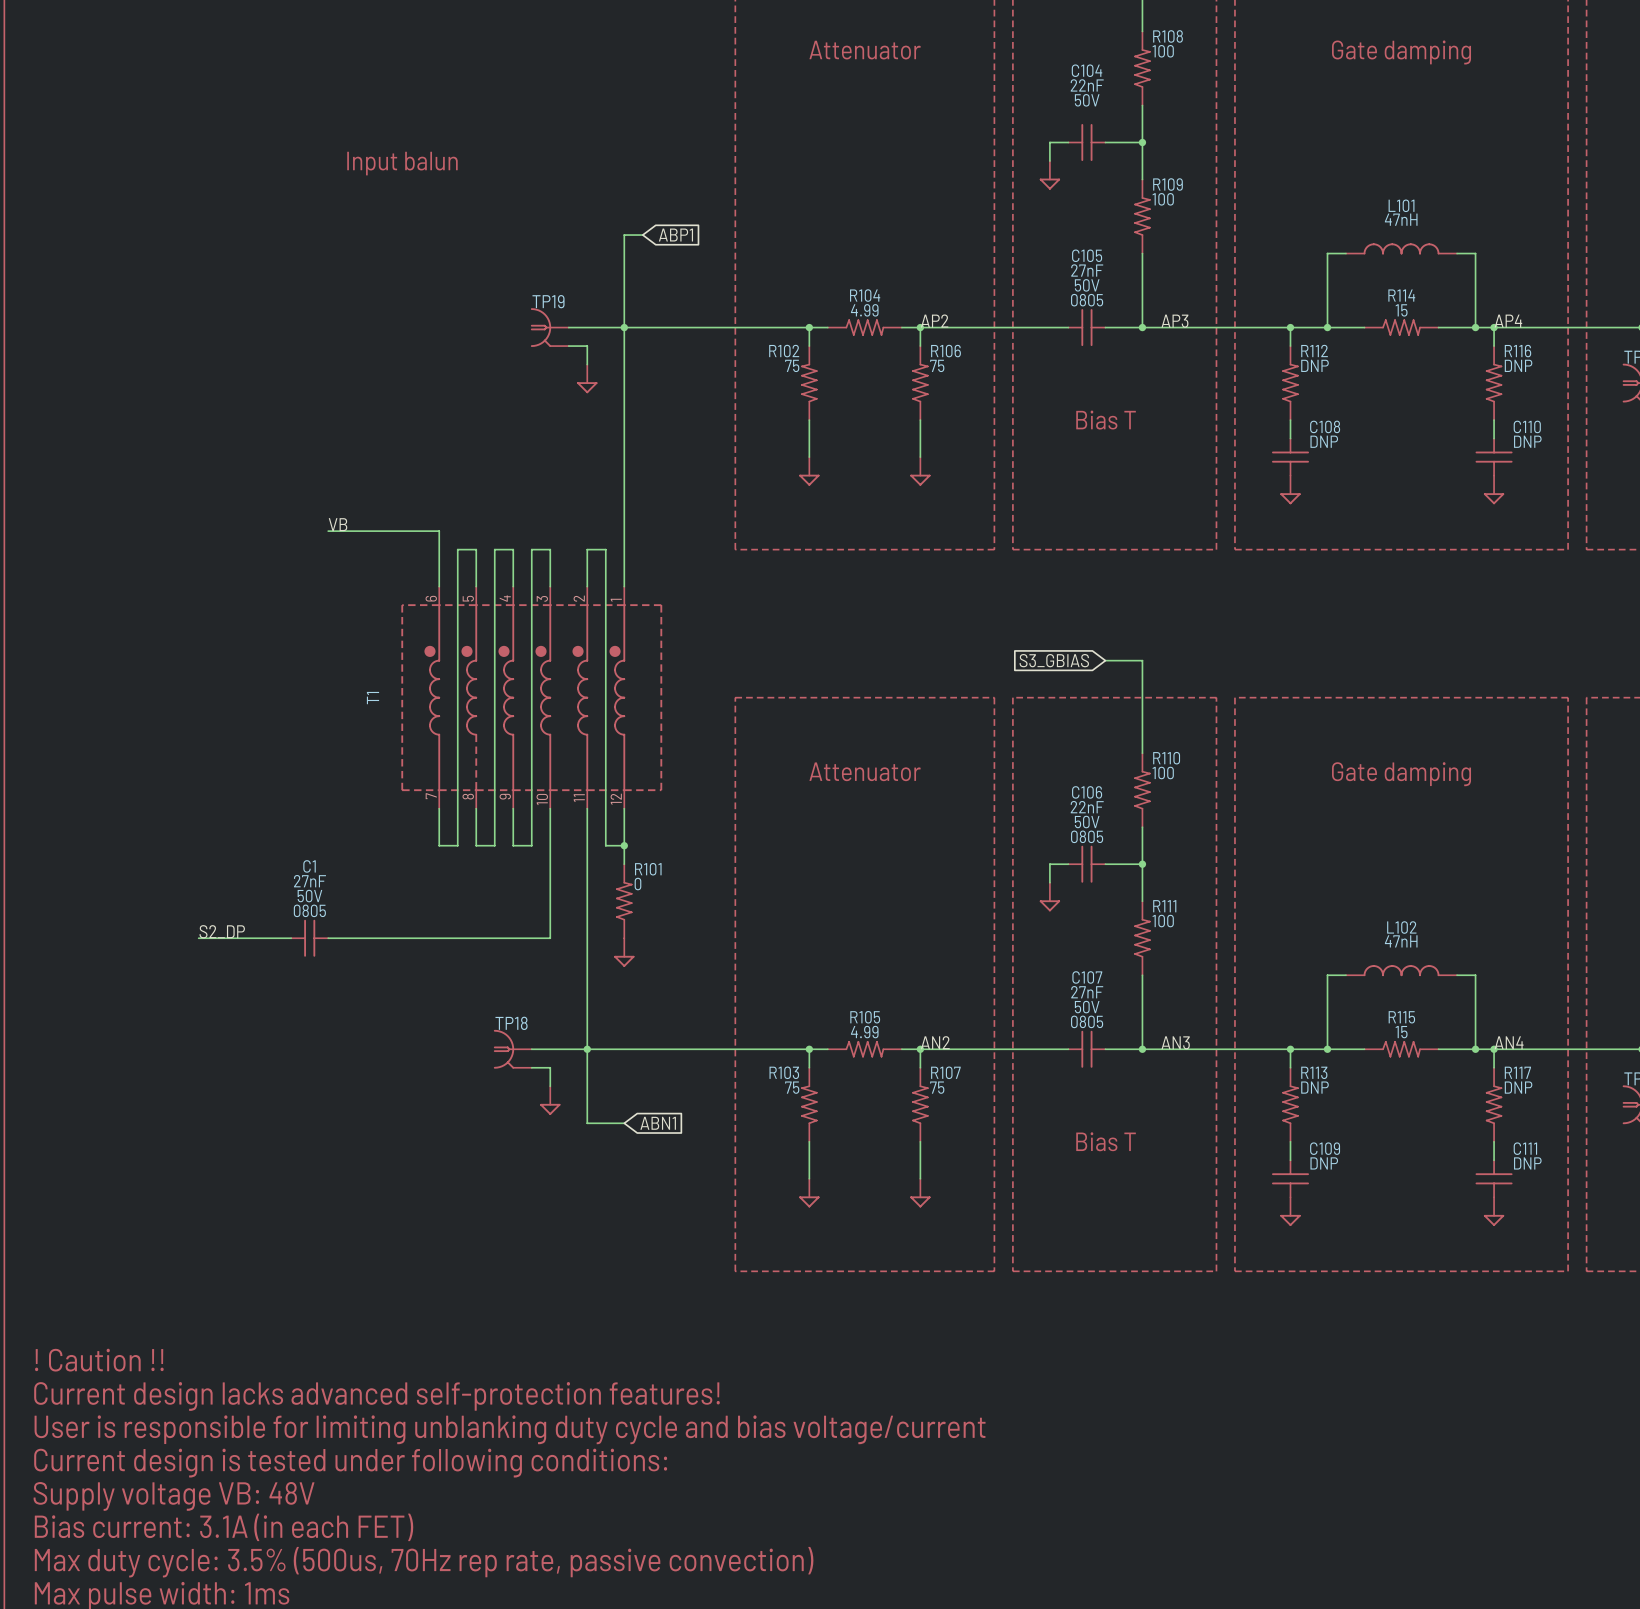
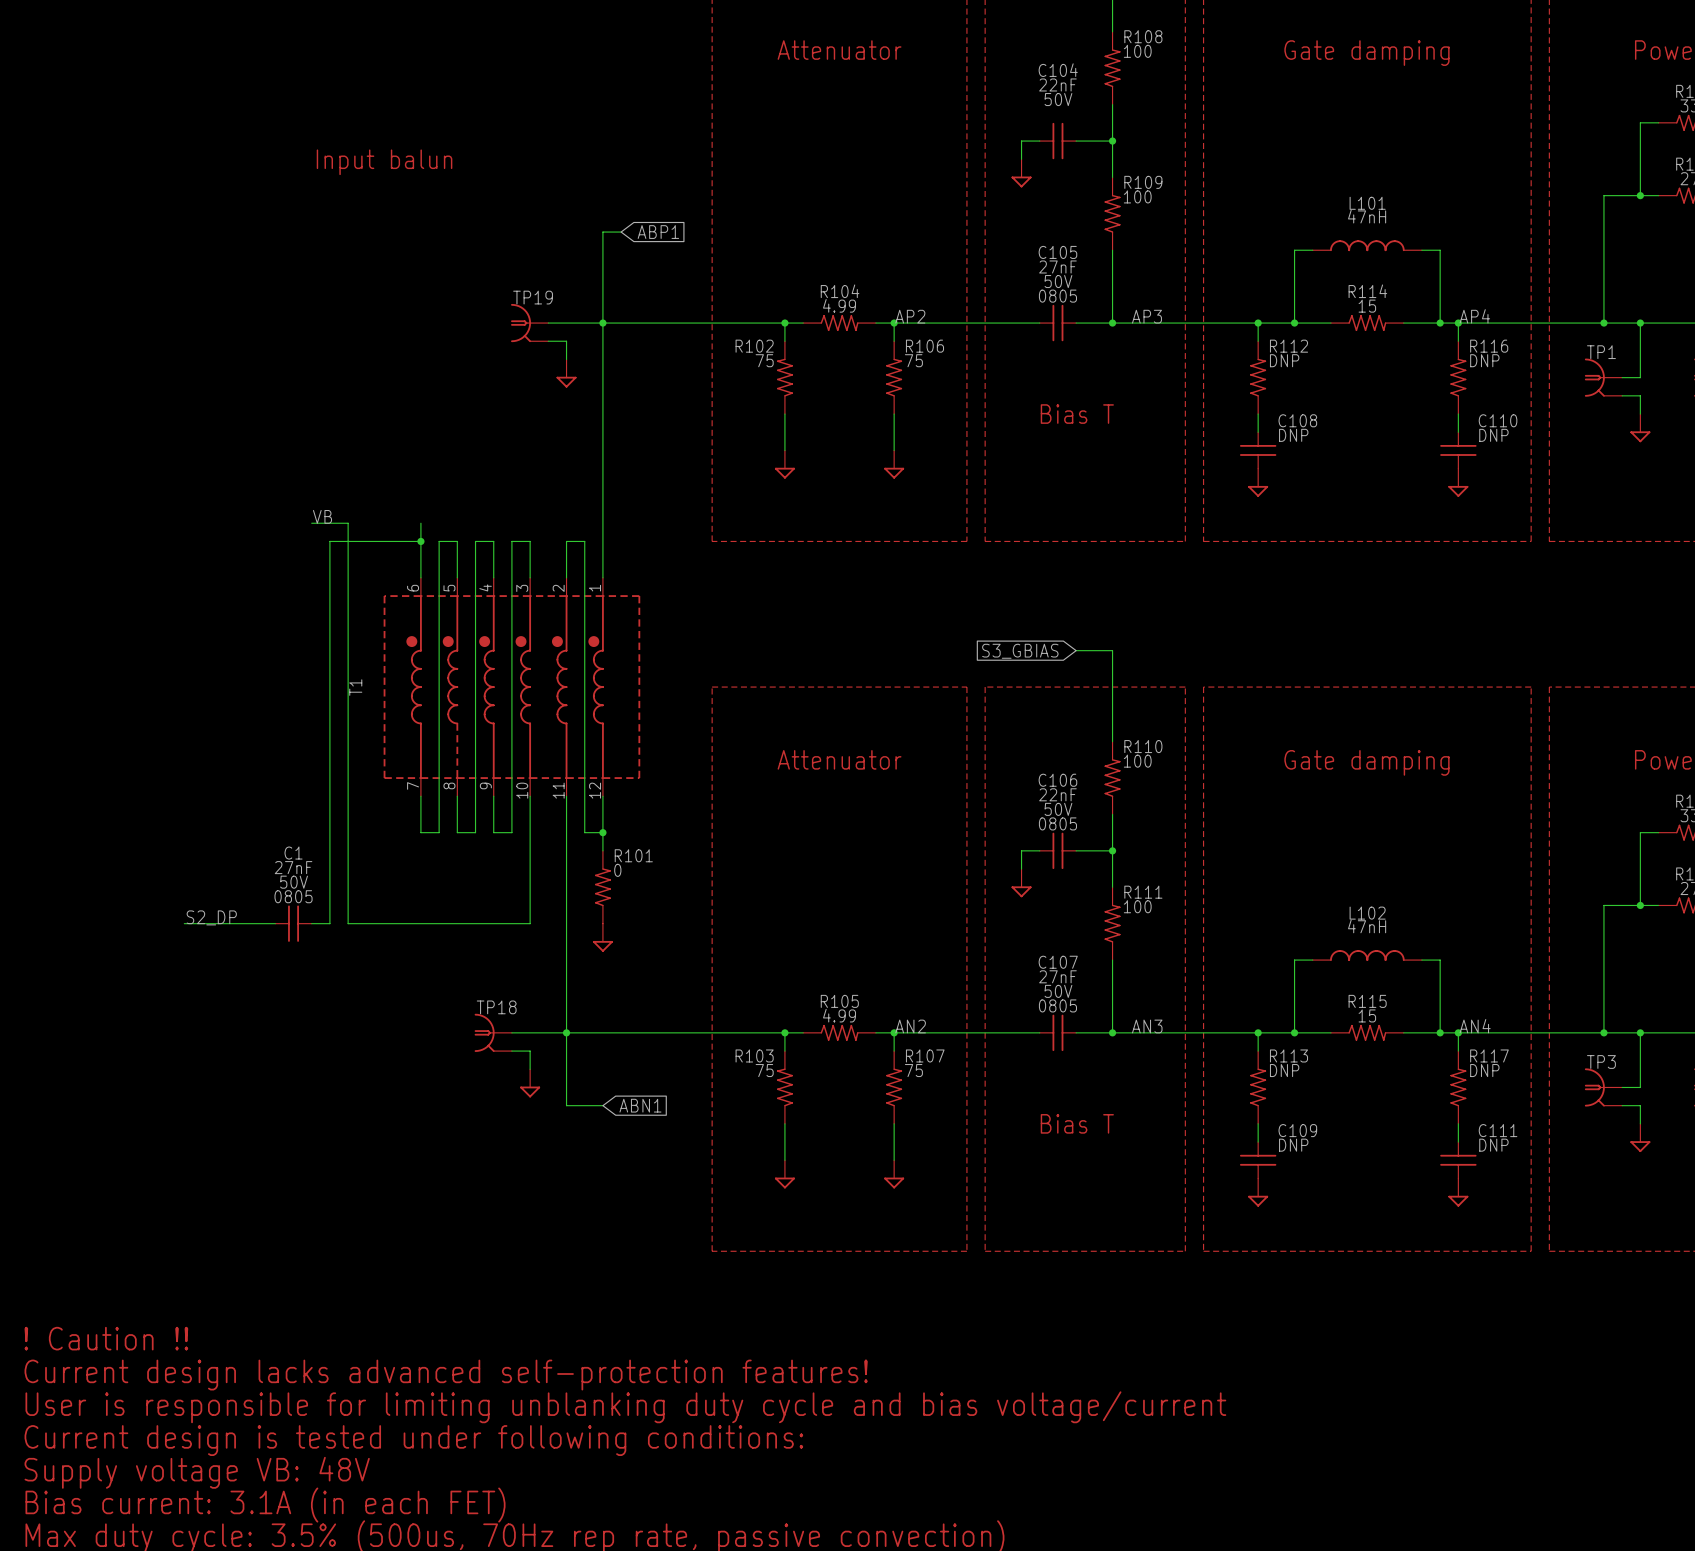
wire: (365, 531) (439, 531) -> (348, 523) (348, 923)
junction: none -> (420, 541)
wire: (346, 938) (365, 938) -> (329, 923) (329, 541) (420, 541)

